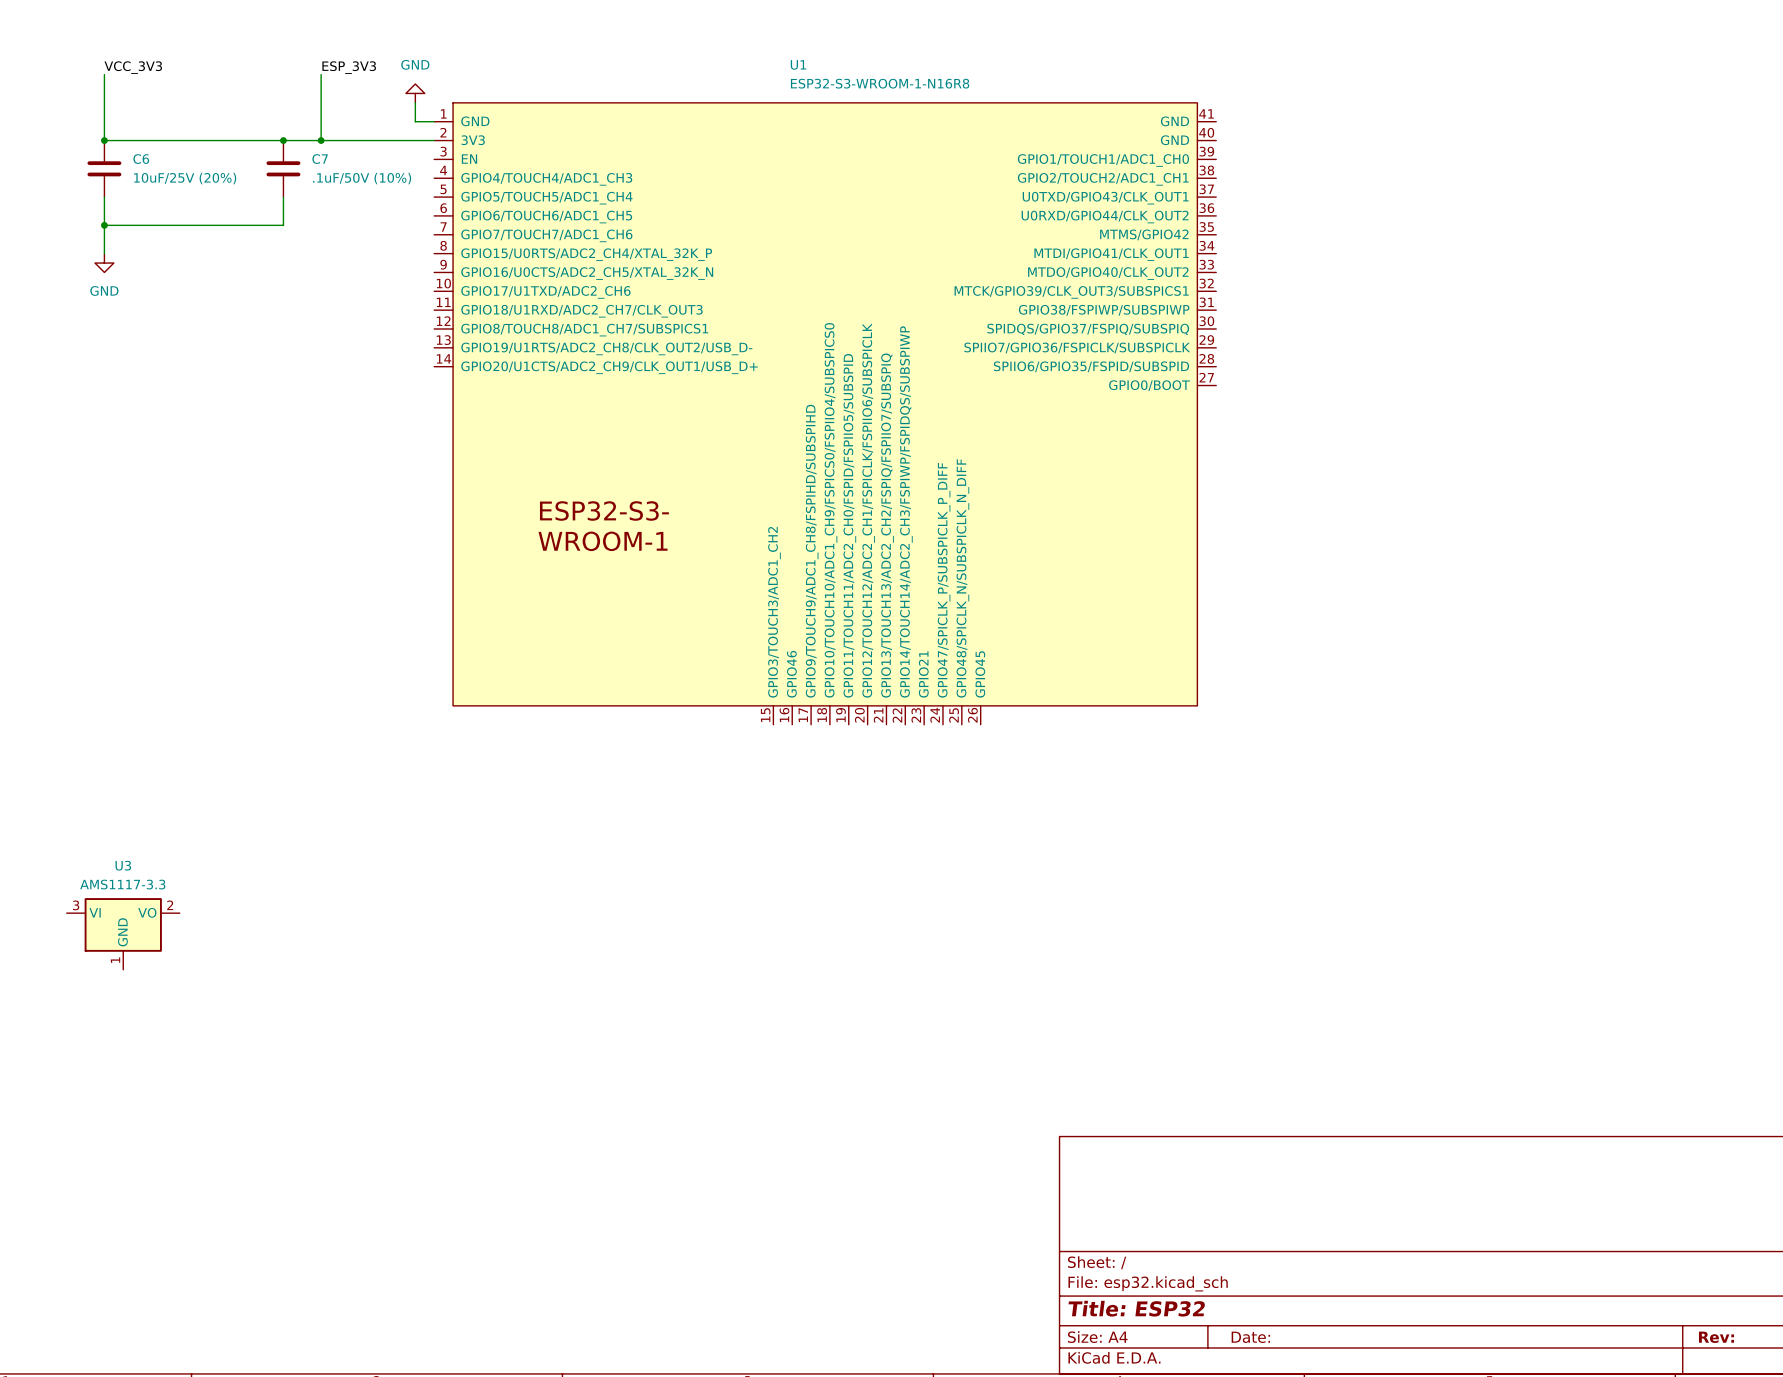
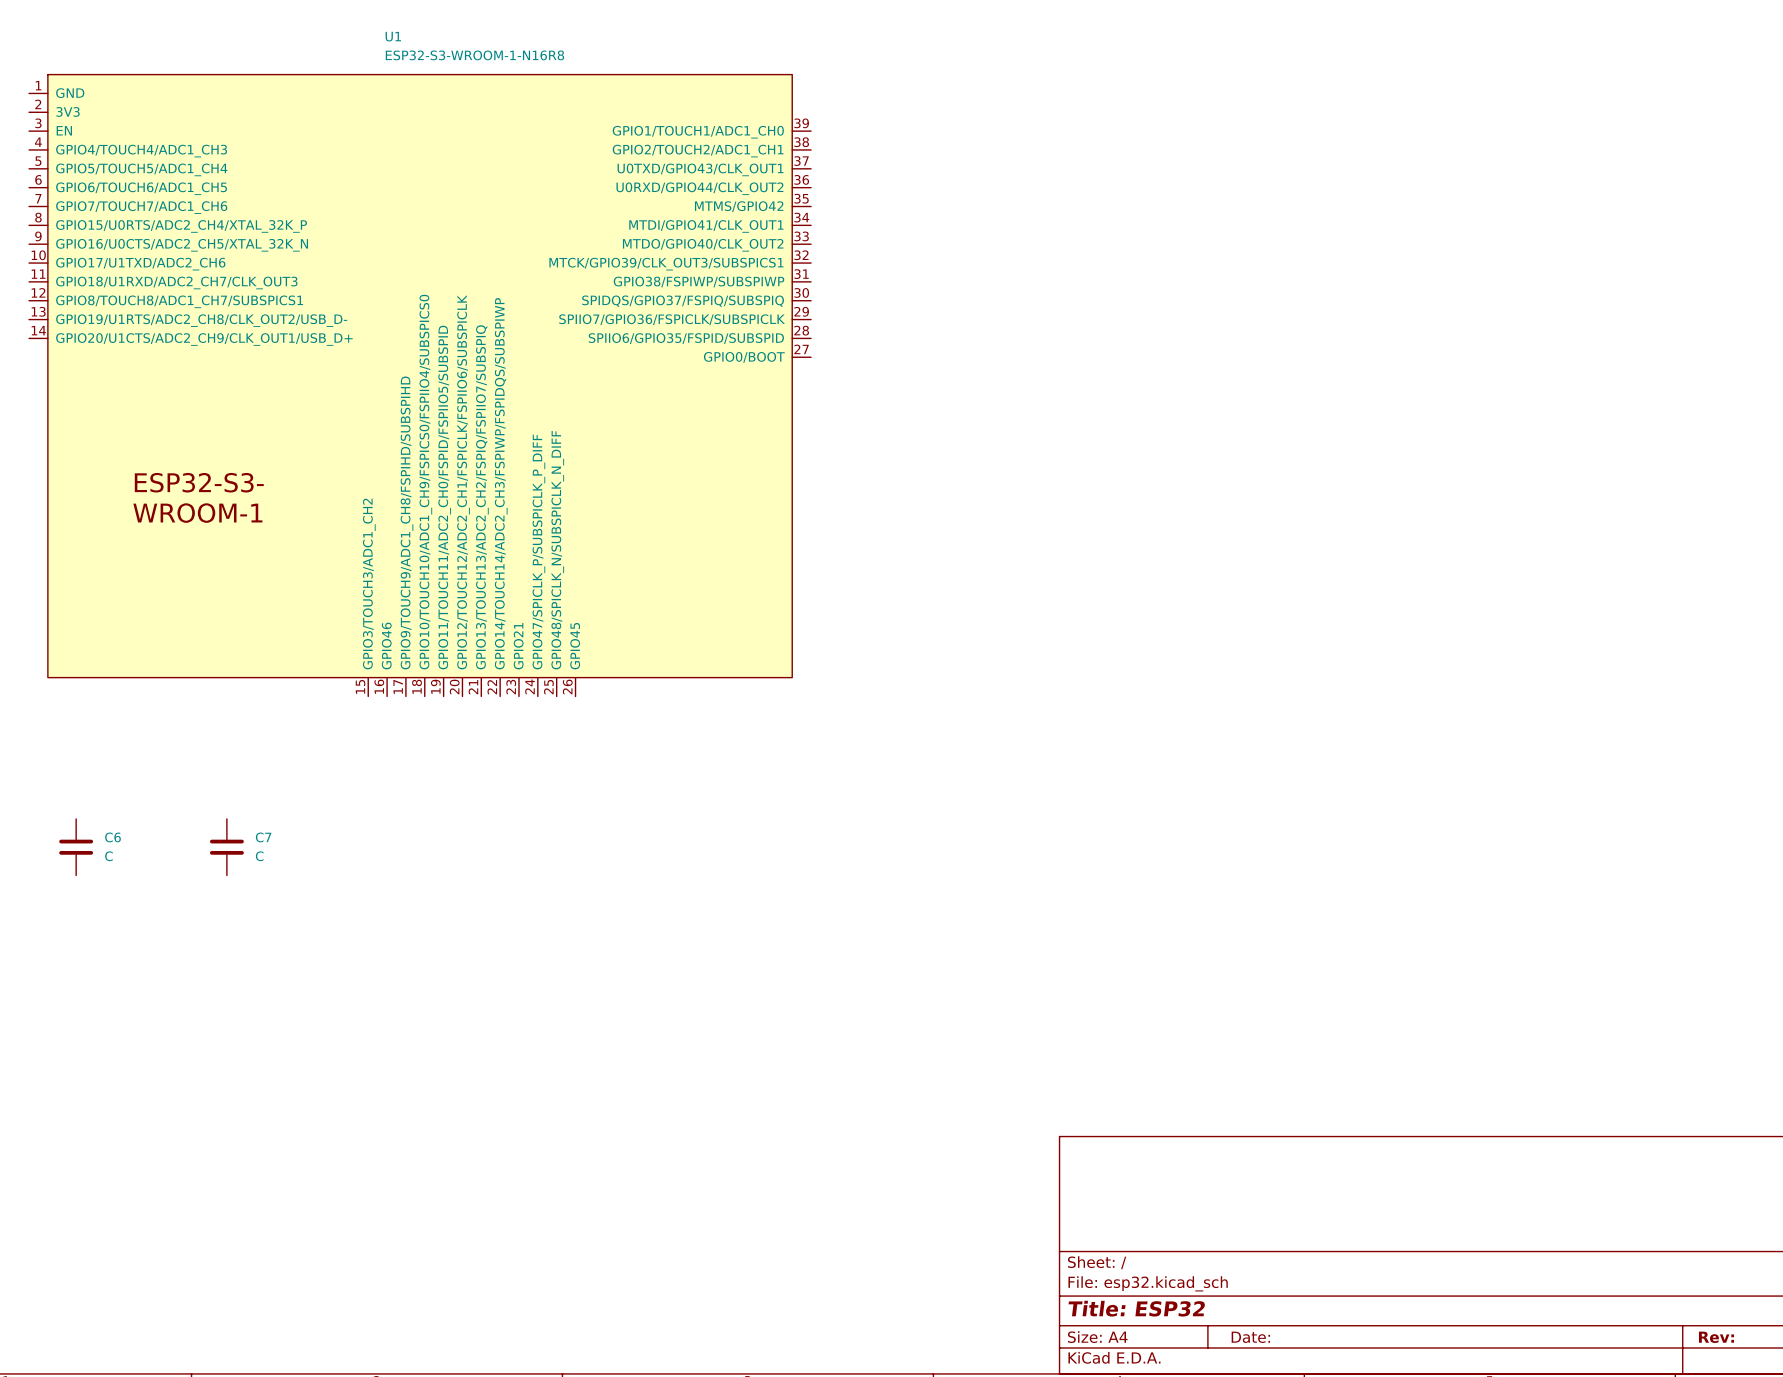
label: VCC_3V3 (133, 67) -> none
label: ESP_3V3 (349, 67) -> none
power symbol: GND (415, 93) -> none
U1 symbol: [434, 102, 1217, 725] -> [29, 74, 812, 697]
junction: (104, 140) -> none
junction: (283, 140) -> none
junction: (321, 140) -> none
C6 position: (104, 168) -> (76, 847)
C7 position: (283, 168) -> (226, 847)
C6 value: 10uF/25V (20%) (185, 178) -> C (108, 856)
C7 value: .1uF/50V (10%) (362, 178) -> C (259, 856)
junction: (104, 225) -> none
power symbol: GND (104, 263) -> none
U3: AMS1117-3.3 (123, 933) -> none

